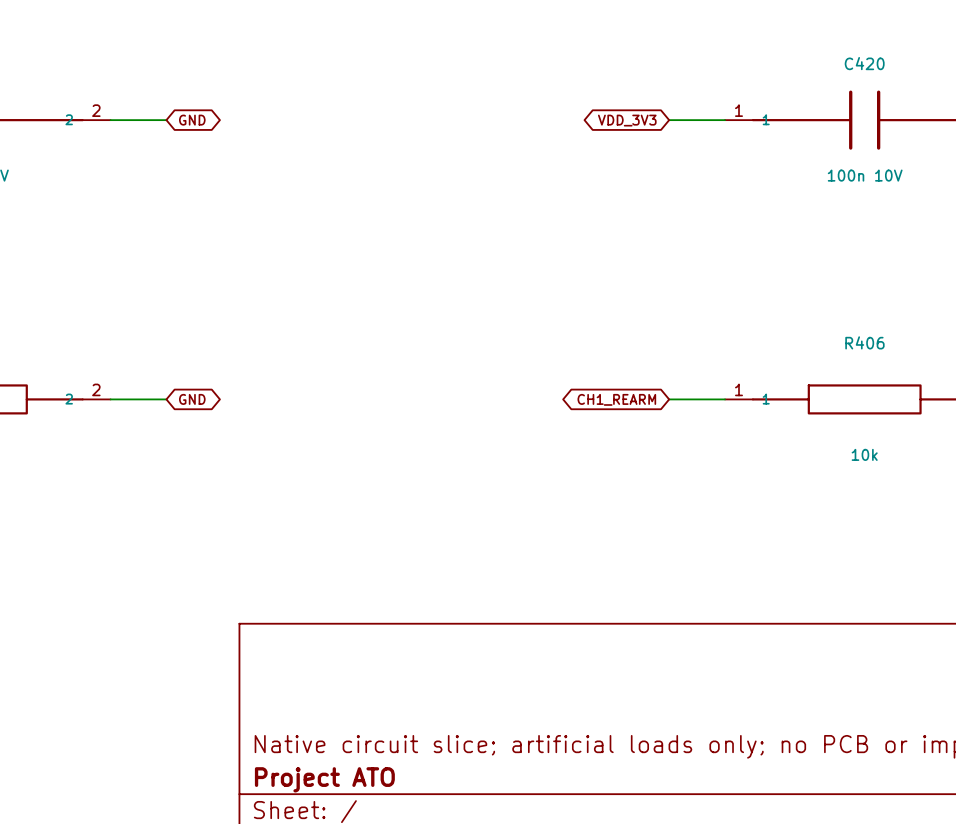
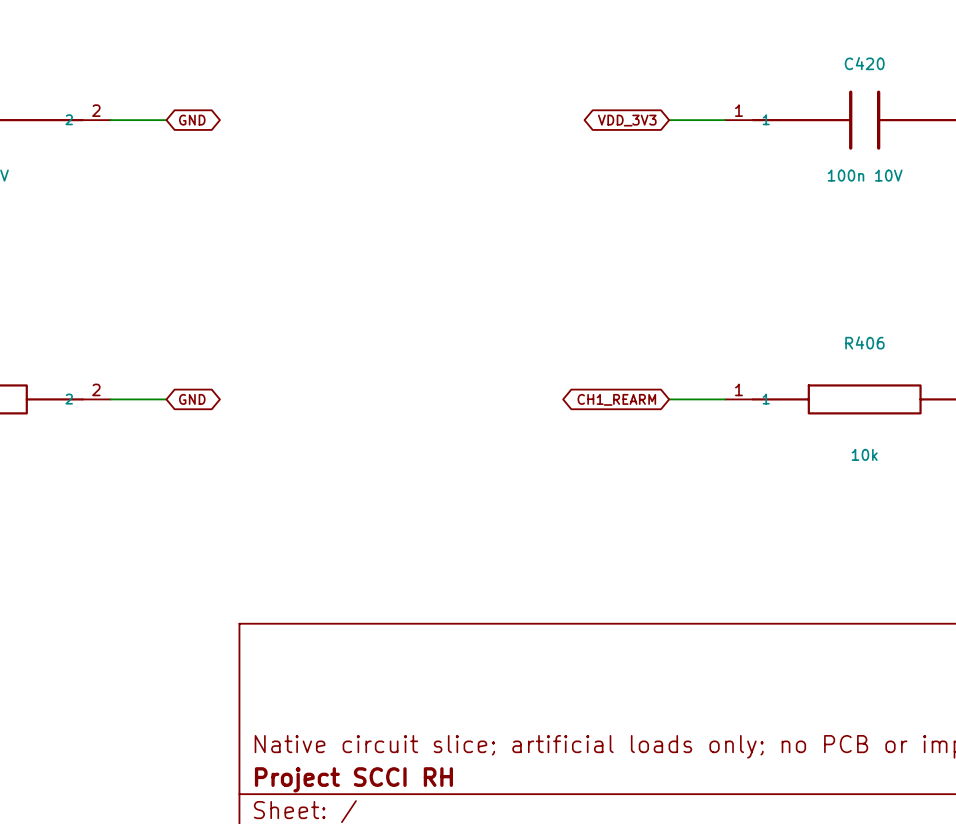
title block: Project ATO (324, 779) -> Project SCCI RH (353, 779)

